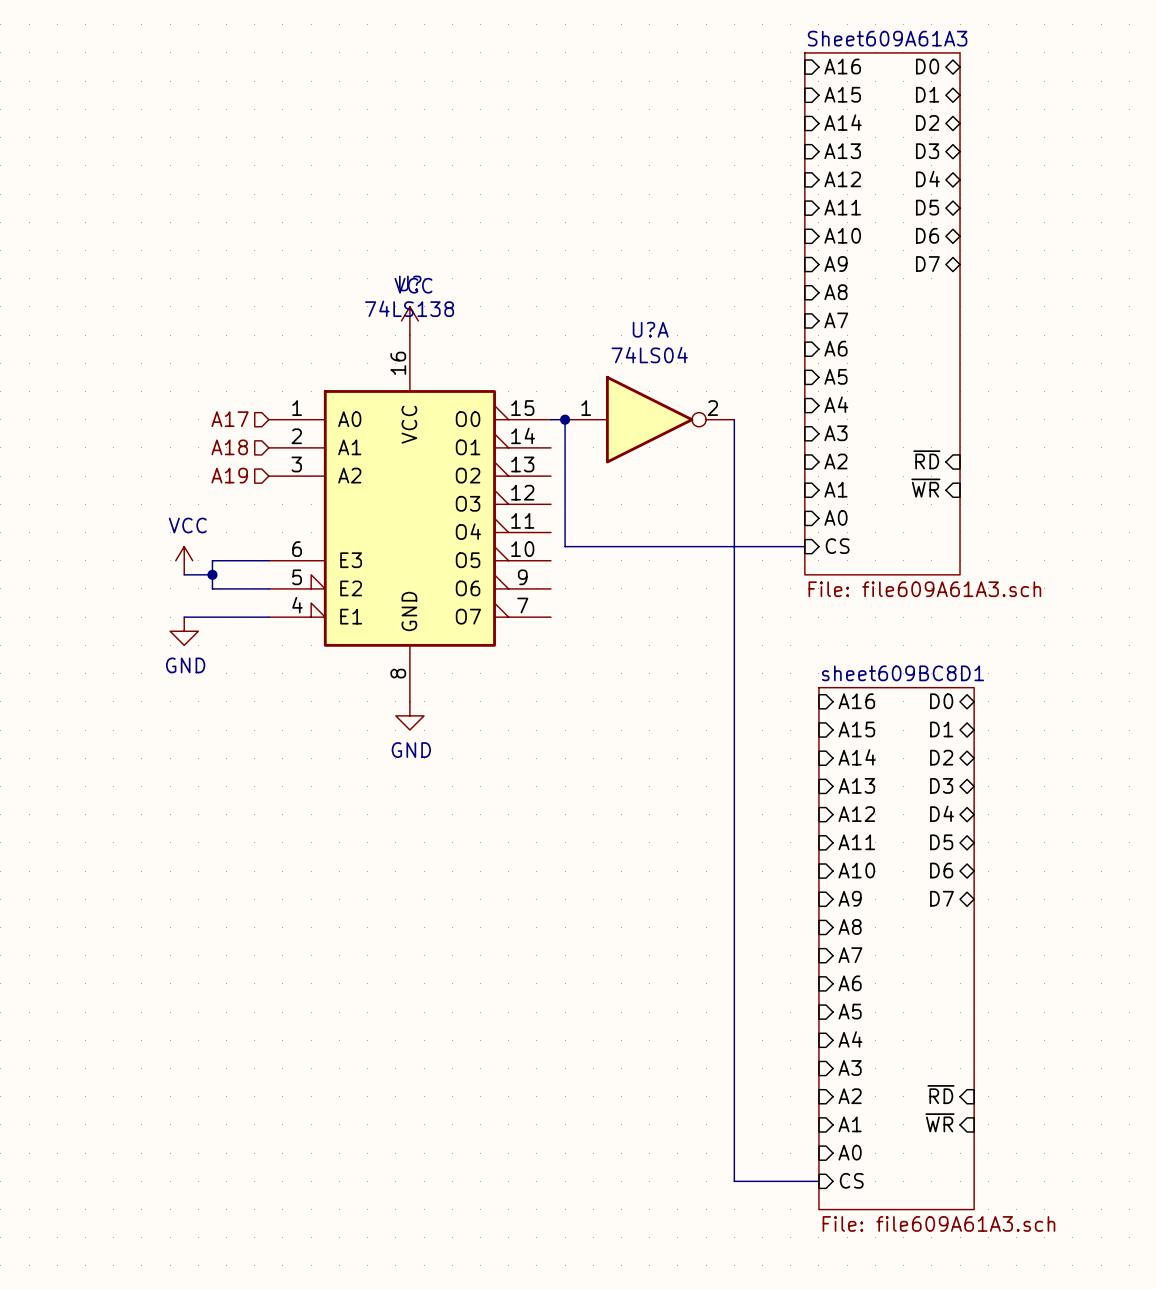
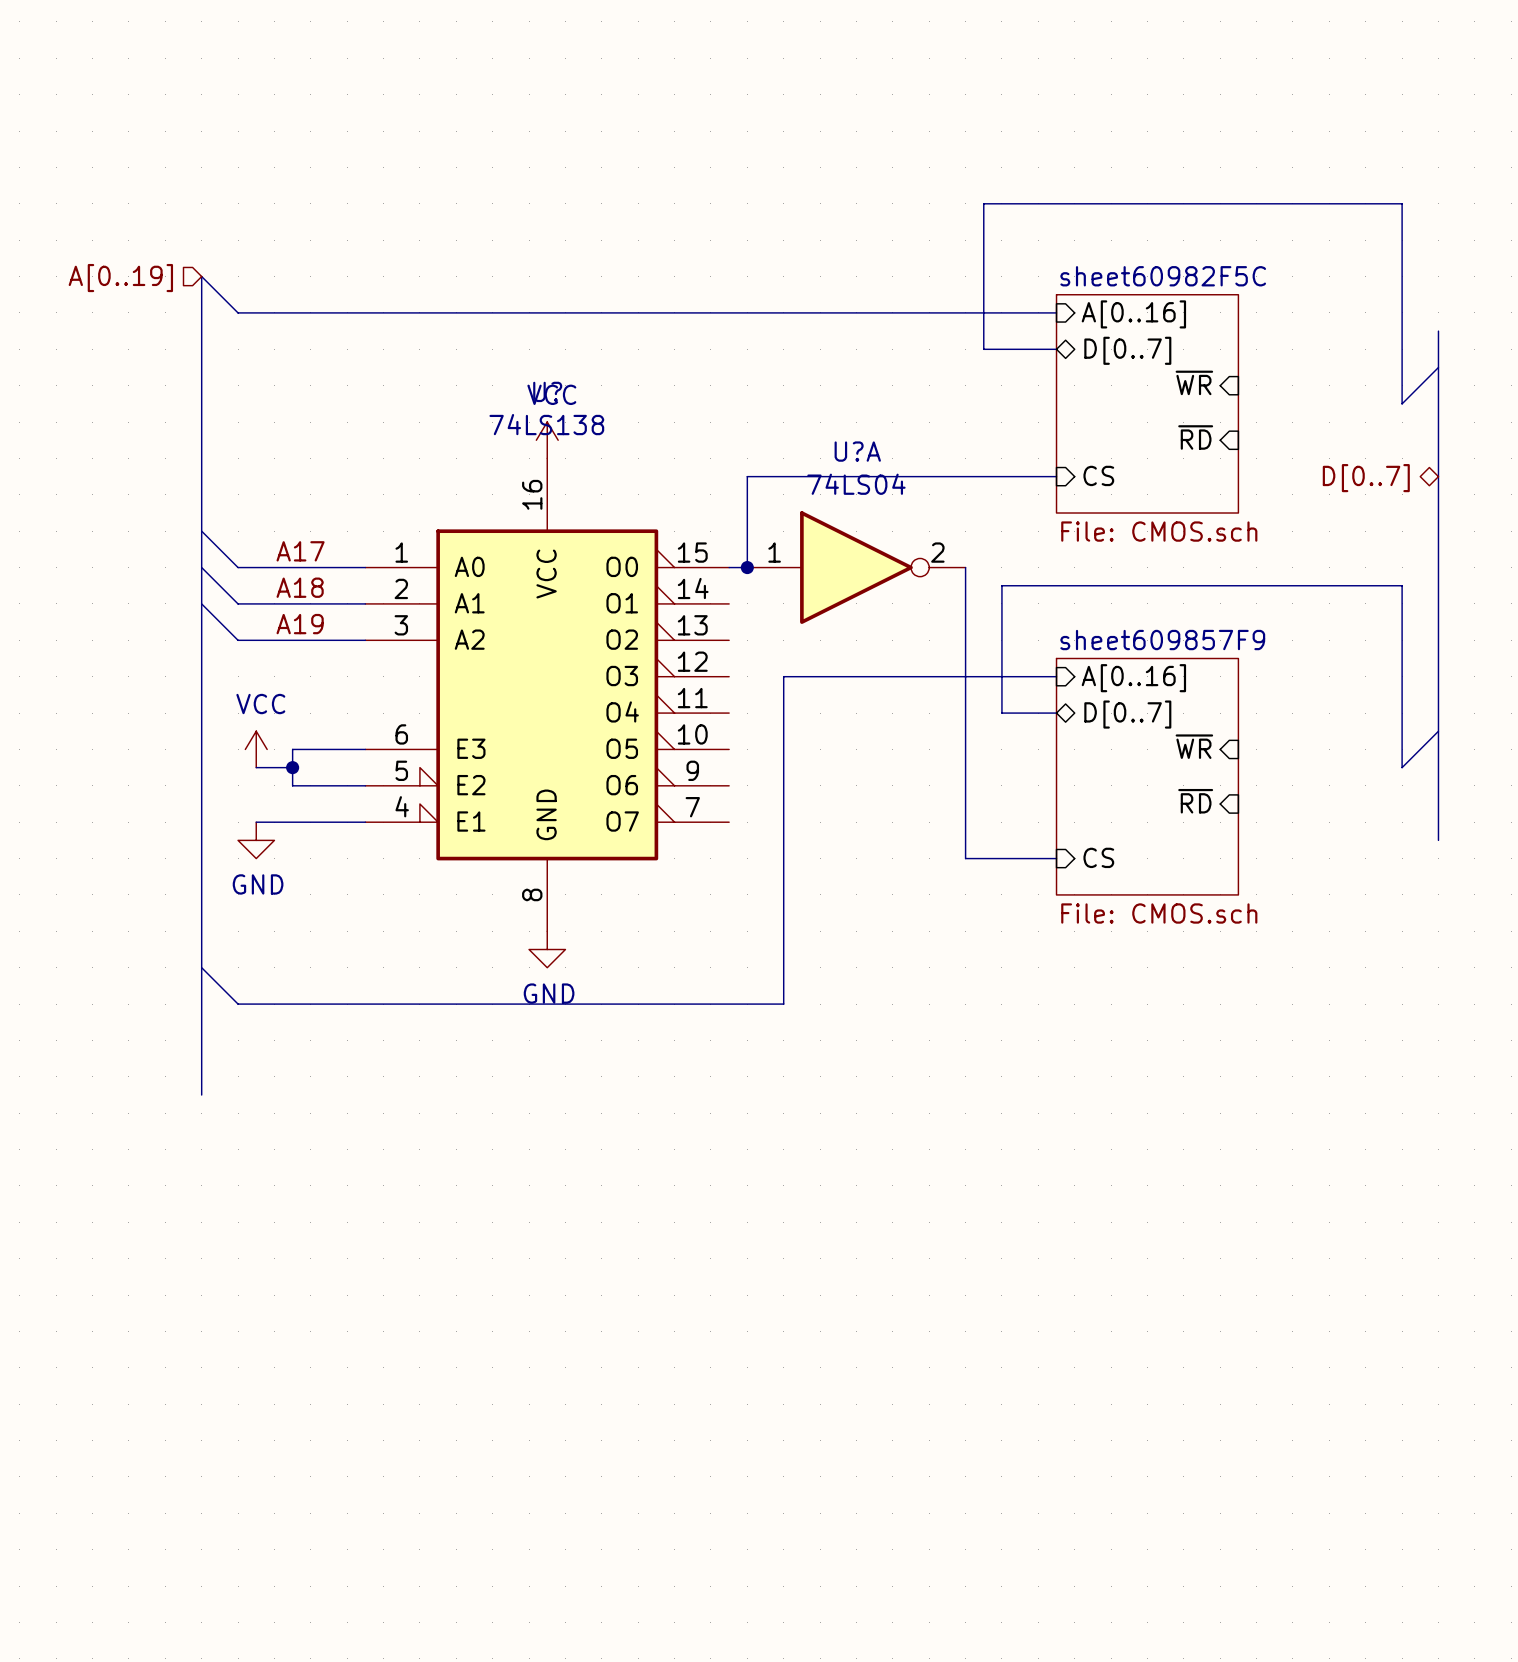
sheet pin: A16 (842, 66) -> none
sheet pin: D0 (927, 66) -> none
sheet pin: A15 (842, 94) -> none
sheet pin: D1 (927, 94) -> none
sheet pin: A14 (843, 122) -> none
sheet pin: D2 (927, 122) -> none
sheet pin: A13 (842, 151) -> none
sheet pin: D3 (927, 151) -> none
sheet pin: A12 (842, 179) -> none
sheet pin: D4 (927, 179) -> none
wire: none -> (201, 276) (238, 312) (1056, 312)
bus: none -> (201, 276) (201, 1095)
hierarchical label: none -> A[0..19] (120, 278)
sheet pin: A11 (842, 207) -> none
sheet pin: D5 (927, 207) -> none
sheet pin: none -> A[0..16] (1133, 314)
sheet pin: A10 (842, 235) -> none
sheet pin: D6 (927, 235) -> none
bus: none -> (1438, 331) (1438, 840)
wire: none -> (1056, 349) (983, 349) (983, 203) (1402, 203) (1402, 403) (1438, 367)
sheet pin: none -> D[0..7] (1127, 350)
sheet pin: A9 (835, 264) -> none
sheet pin: D7 (927, 264) -> none
sheet pin: none -> ~{WR} (1194, 382)
sheet pin: A8 (835, 292) -> none
sheet sheet60982F5C: none -> File: CMOS.sch (1147, 403)
sheet Sheet609A61A3: File: file609A61A3.sch (882, 313) -> none
sheet pin: none -> ~{RD} (1195, 437)
sheet pin: A7 (836, 320) -> none
sheet pin: A6 (835, 348) -> CS (1098, 475)
hierarchical label: none -> D[0..7] (1366, 478)
sheet pin: A5 (835, 376) -> none
wire: none -> (201, 531) (238, 567) (365, 567)
sheet pin: A4 (836, 404) -> none
label: none -> A17 (300, 551)
wire: none -> (201, 567) (238, 603) (365, 603)
hierarchical label: A17 (230, 419) -> none
wire: (565, 419) (565, 546) (804, 546) -> (747, 567) (747, 476) (1056, 476)
sheet pin: A3 (835, 433) -> none
label: none -> A18 (300, 587)
wire: none -> (201, 603) (238, 640) (365, 640)
hierarchical label: A18 (229, 447) -> none
sheet pin: ~{RD} (926, 459) -> none
sheet pin: A2 (835, 461) -> none
label: none -> A19 (300, 624)
hierarchical label: A19 (229, 475) -> none
sheet pin position: ~{WR} (925, 488) -> ~{WR} (1194, 746)
sheet pin: A1 (835, 489) -> none
wire: none -> (1056, 676) (783, 676) (783, 1004) (238, 1004) (201, 967)
sheet pin: none -> A[0..16] (1133, 678)
sheet pin: A0 (835, 517) -> none
wire: none -> (1056, 713) (1001, 713) (1001, 585) (1402, 585) (1402, 767) (1438, 731)
sheet pin: none -> D[0..7] (1127, 714)
sheet pin position: CS (837, 546) -> CS (1098, 857)
sheet sheet609857F9: none -> File: CMOS.sch (1147, 776)
sheet pin: none -> ~{RD} (1195, 801)
wire: (734, 645) (734, 1181) (818, 1181) -> (965, 858) (1056, 858)
sheet pin: A16 (856, 701) -> none
sheet pin: D0 (941, 701) -> none
sheet pin: A15 (856, 729) -> none
sheet pin: D1 (941, 729) -> none
sheet pin: A14 (857, 757) -> none
sheet pin: D2 (941, 757) -> none
sheet pin: A13 (856, 785) -> none
sheet pin: D3 (941, 785) -> none
sheet pin: D4 (941, 813) -> none
sheet pin: A12 (856, 814) -> none
sheet pin: A11 (856, 842) -> none
sheet pin: D5 (941, 842) -> none
sheet pin: A10 (856, 870) -> none
sheet pin: D6 (941, 870) -> none
sheet pin: A9 (850, 898) -> none
sheet pin: D7 (941, 898) -> none
sheet pin: A8 (850, 926) -> none
sheet sheet609BC8D1: File: file609A61A3.sch (896, 948) -> none
sheet pin: A7 (850, 955) -> none
sheet pin: A6 (850, 983) -> none
sheet pin: A5 (850, 1011) -> none
sheet pin: A4 (850, 1039) -> none
sheet pin: A3 (850, 1067) -> none
sheet pin: ~{RD} (940, 1094) -> none
sheet pin: A2 (850, 1096) -> none
sheet pin: ~{WR} (939, 1122) -> none
sheet pin: A1 (850, 1124) -> none
sheet pin: A0 (850, 1152) -> none
sheet pin: CS (851, 1180) -> none

